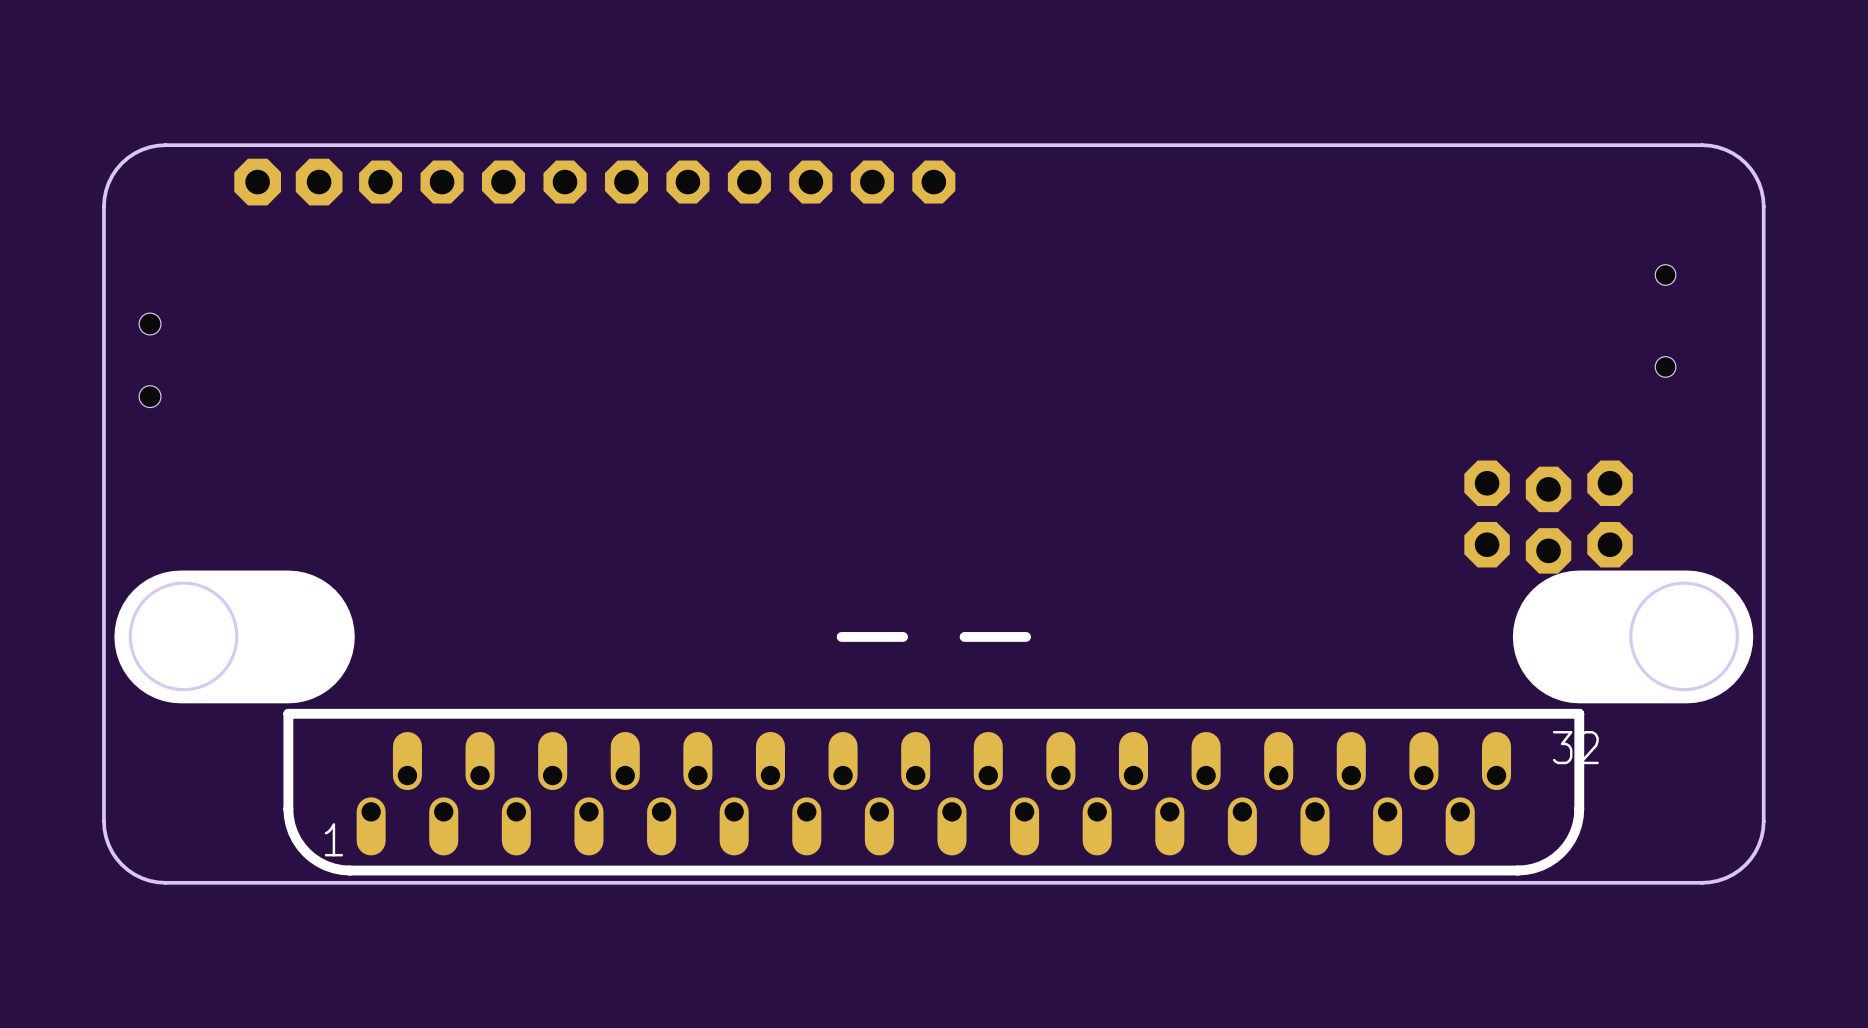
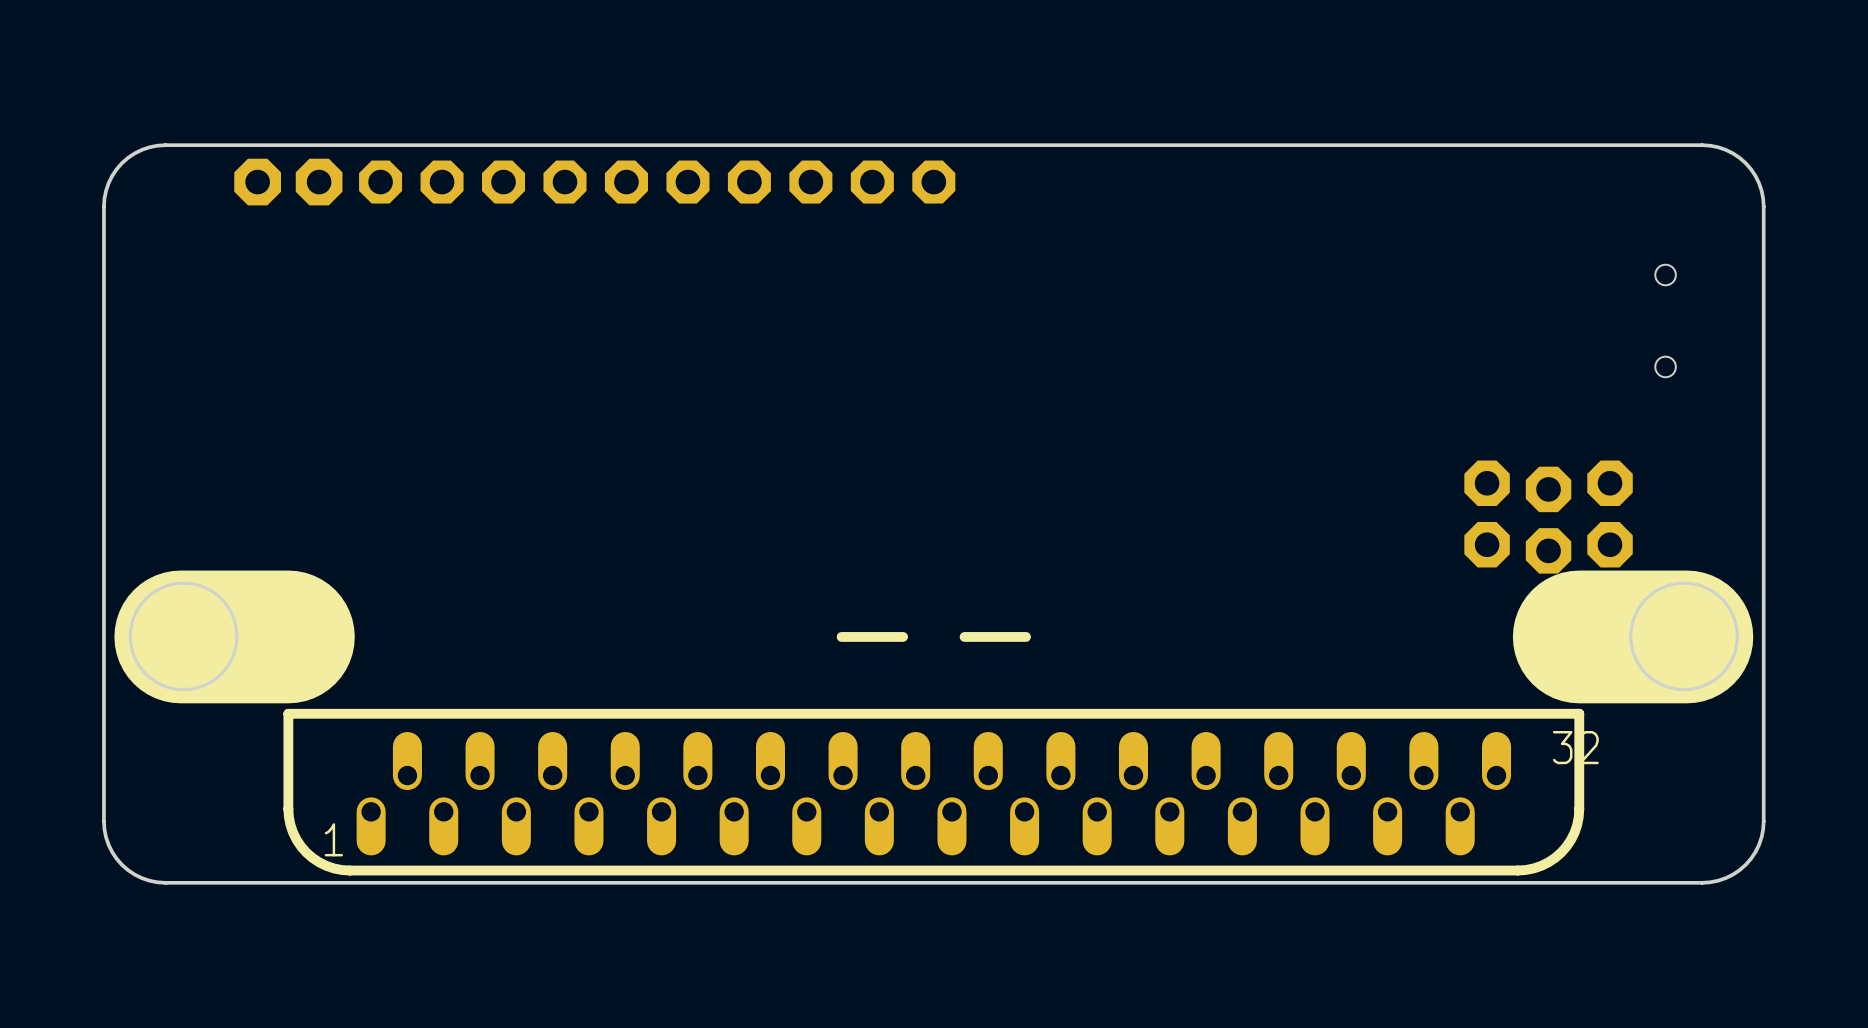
part: (150, 360) -> none

